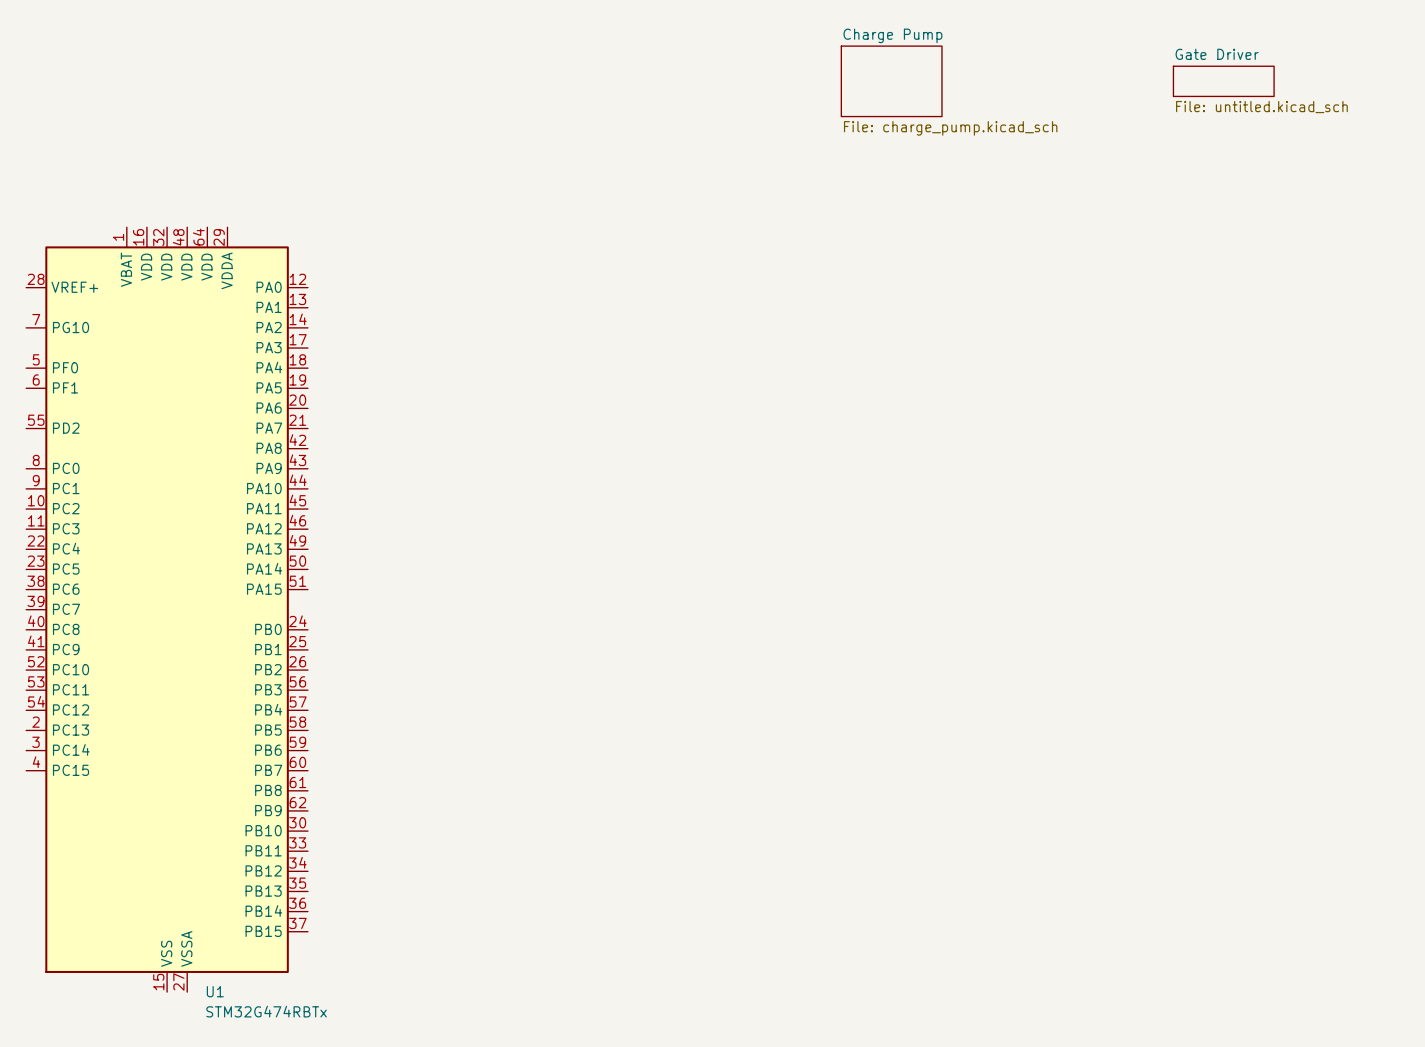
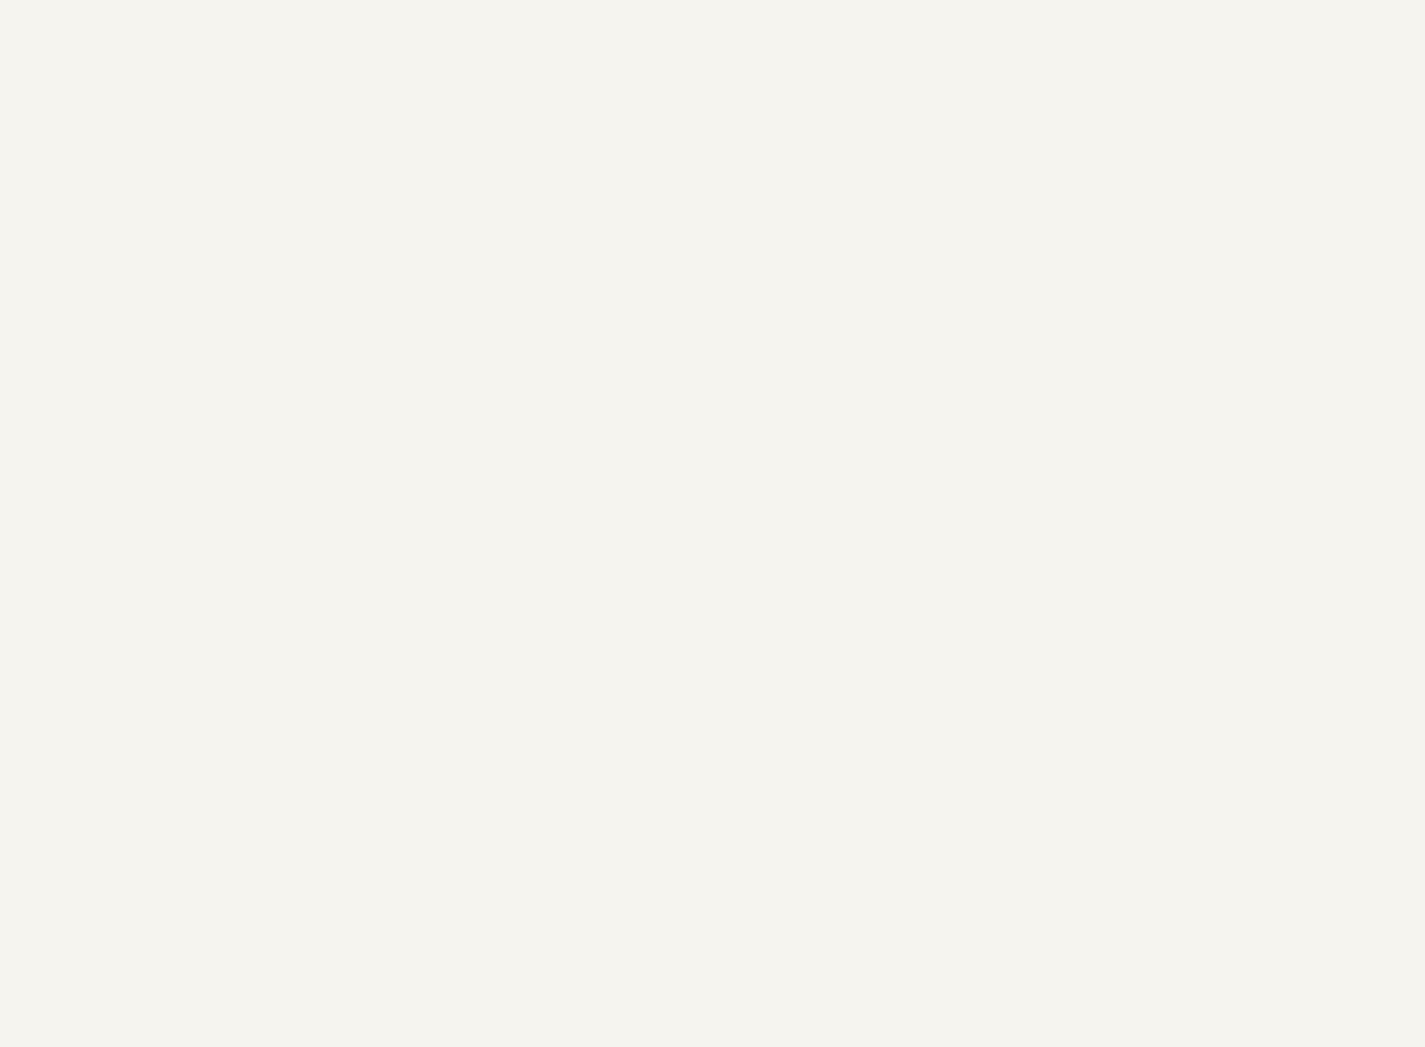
sheet Charge Pump: File: charge_pump.kicad_sch (891, 81) -> none
sheet Gate Driver: File: untitled.kicad_sch (1223, 81) -> none
U1: STM32G474RBTx (167, 609) -> none

